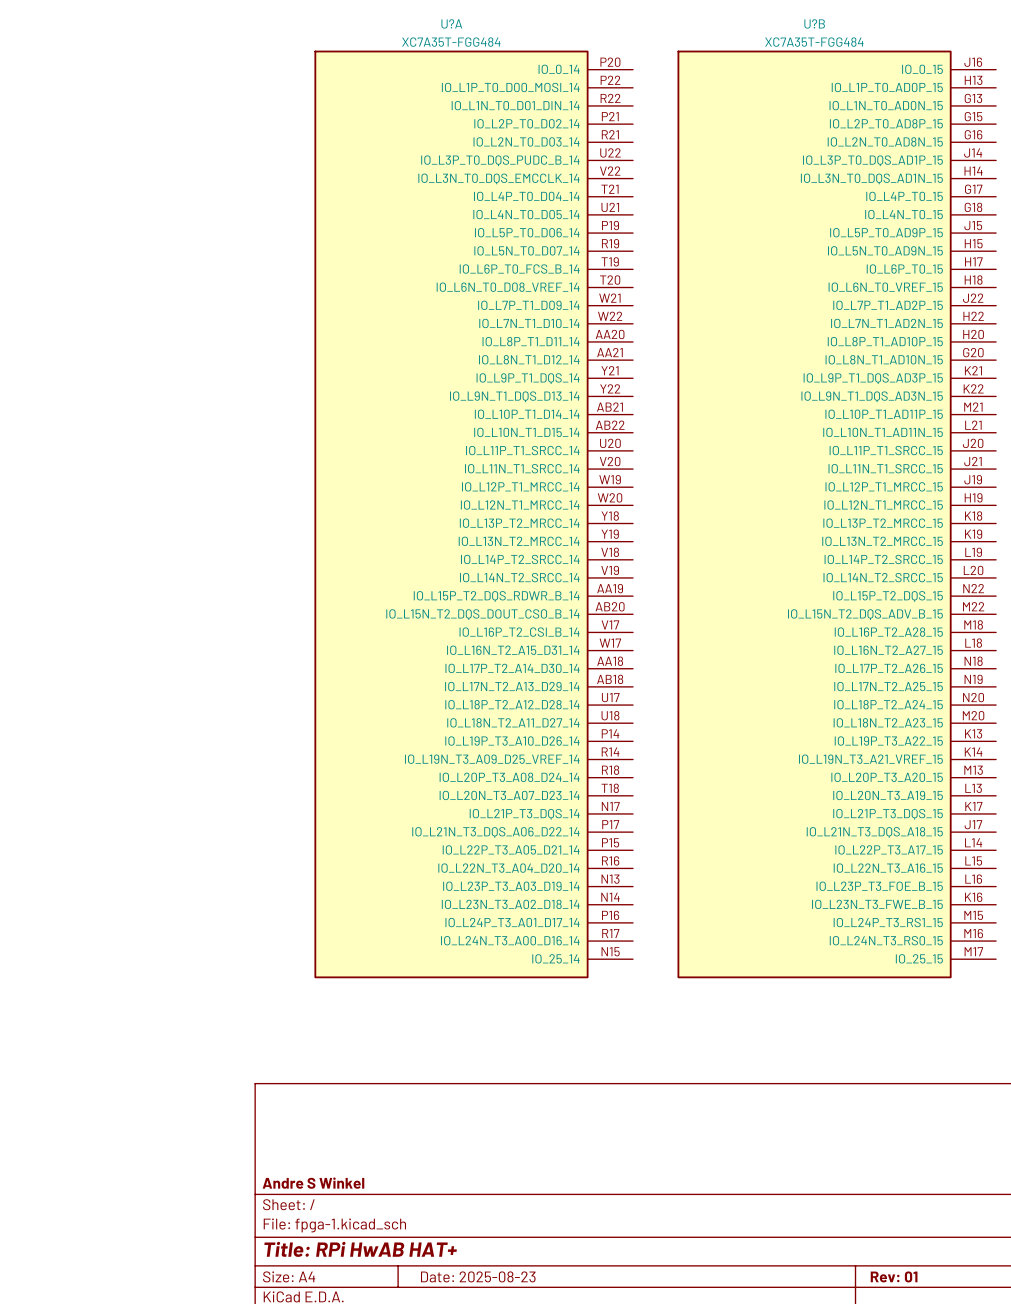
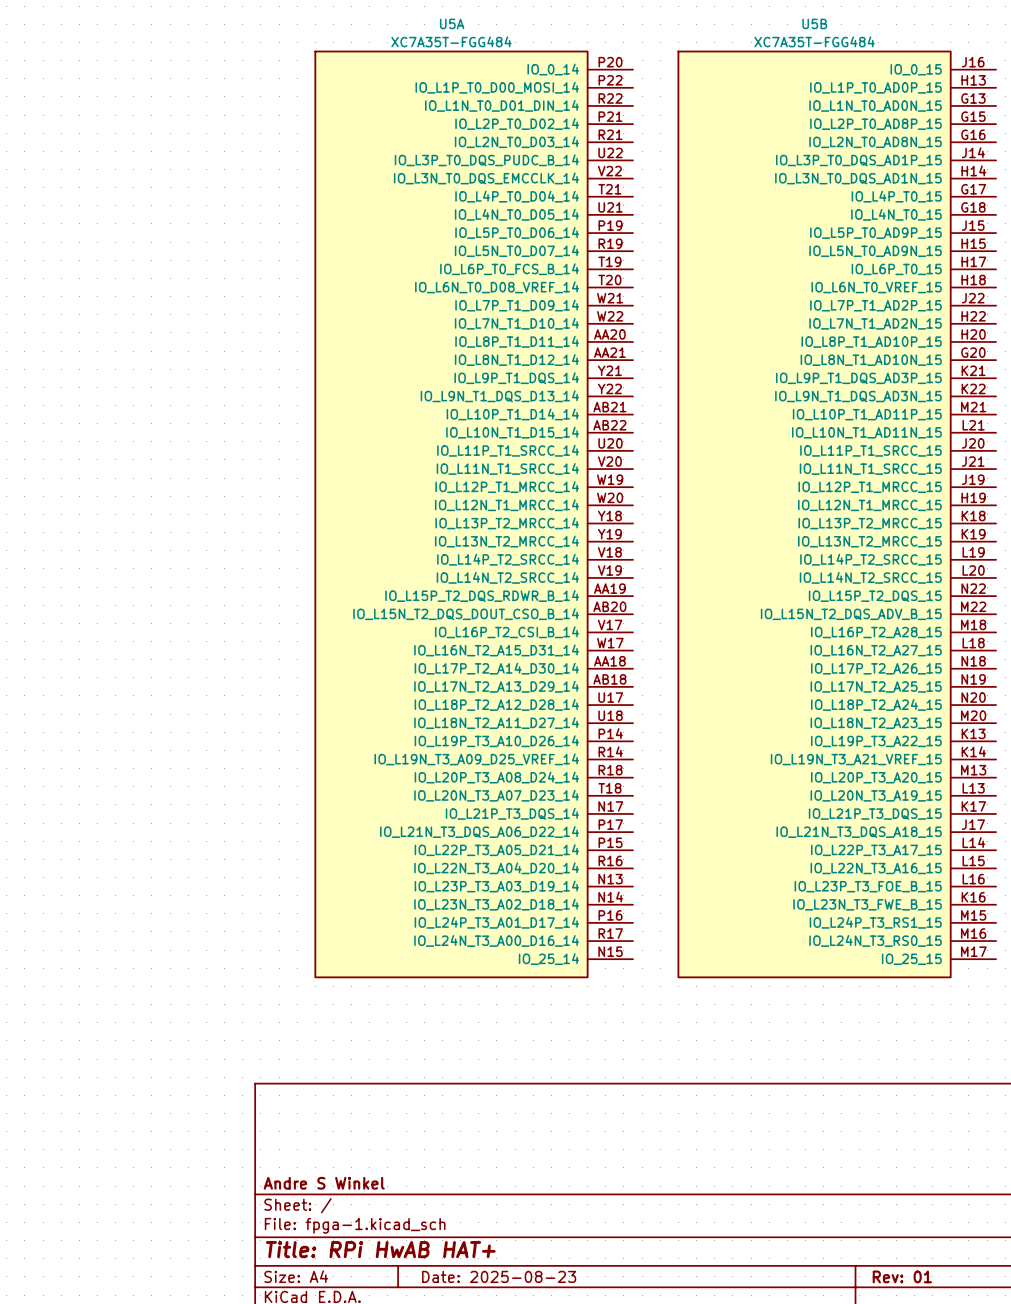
U?A name: U?A (451, 23) -> U5A (452, 23)
U?B name: U?B (814, 23) -> U5B (814, 23)

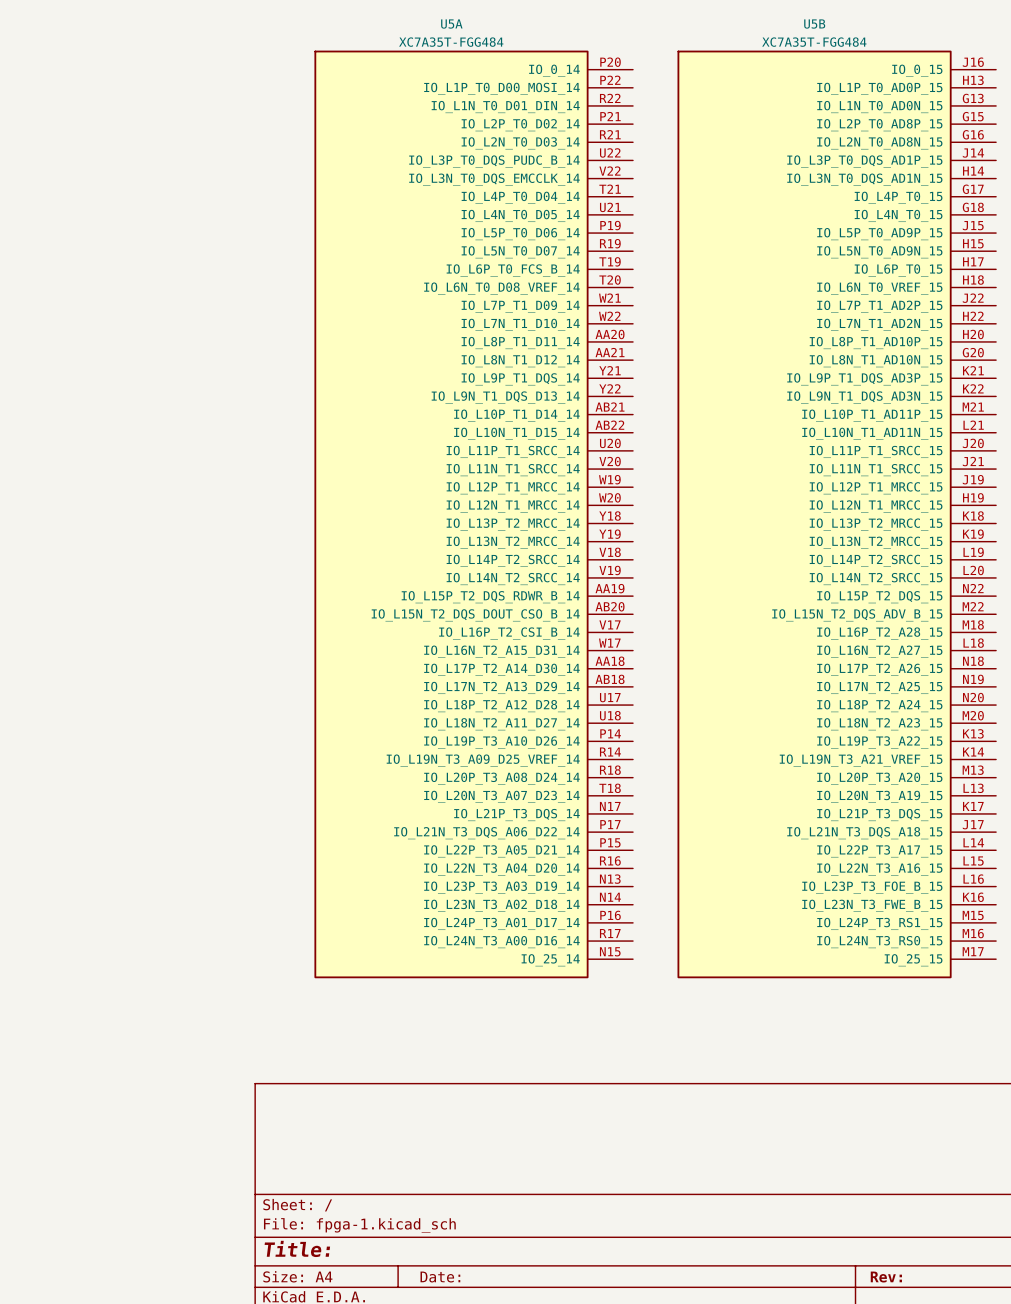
title block: Andre S Winkel (324, 1183) -> none
title block: Title: RPi HwAB HAT+ (380, 1249) -> Title: (297, 1248)
title block: Date: 2025-08-23 (499, 1276) -> Date: (440, 1277)
title block: Rev: 01 (902, 1276) -> Rev: (886, 1277)

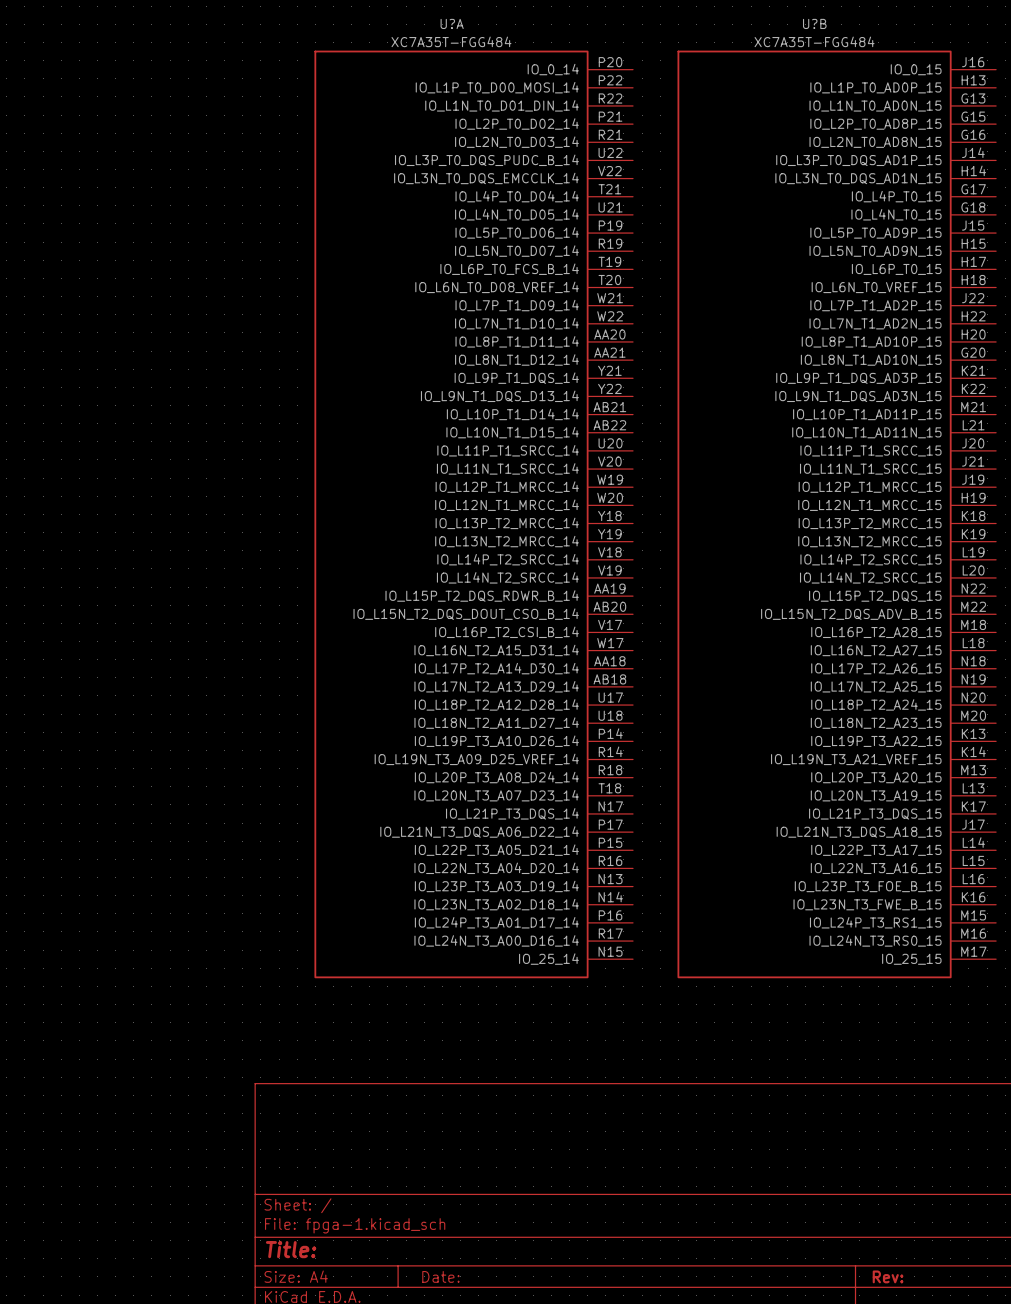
U5A name: U5A (451, 24) -> U?A (452, 23)
U5B name: U5B (814, 24) -> U?B (814, 23)

